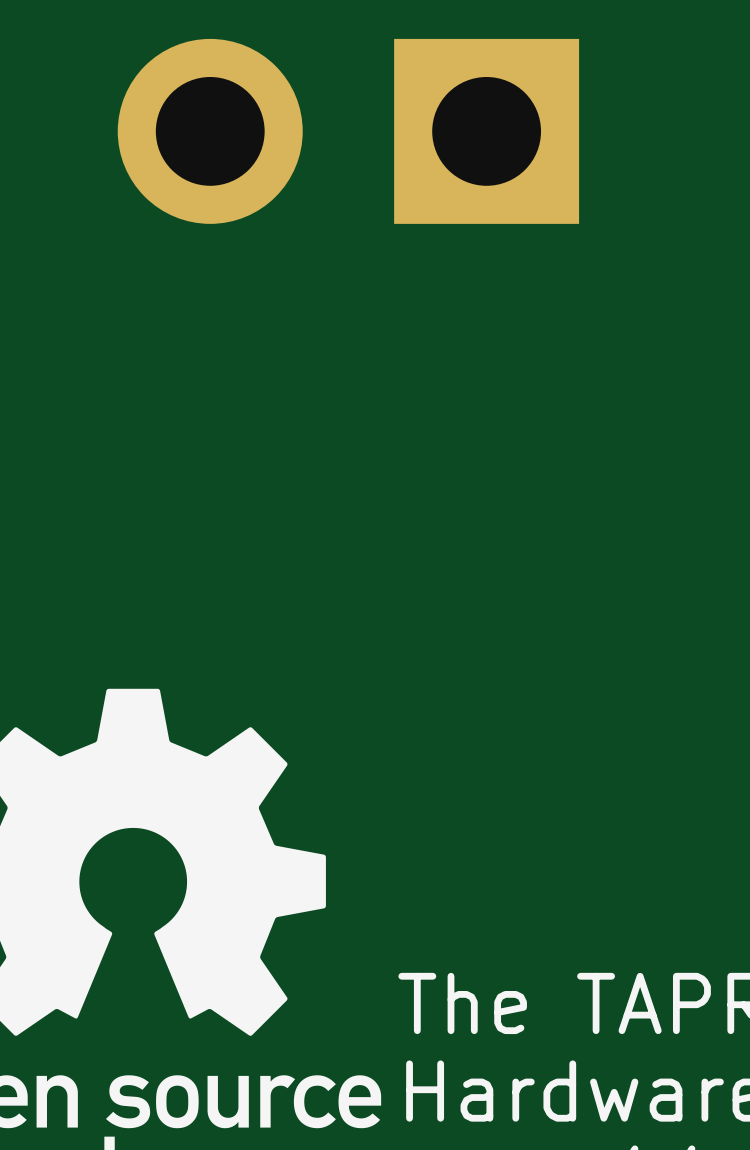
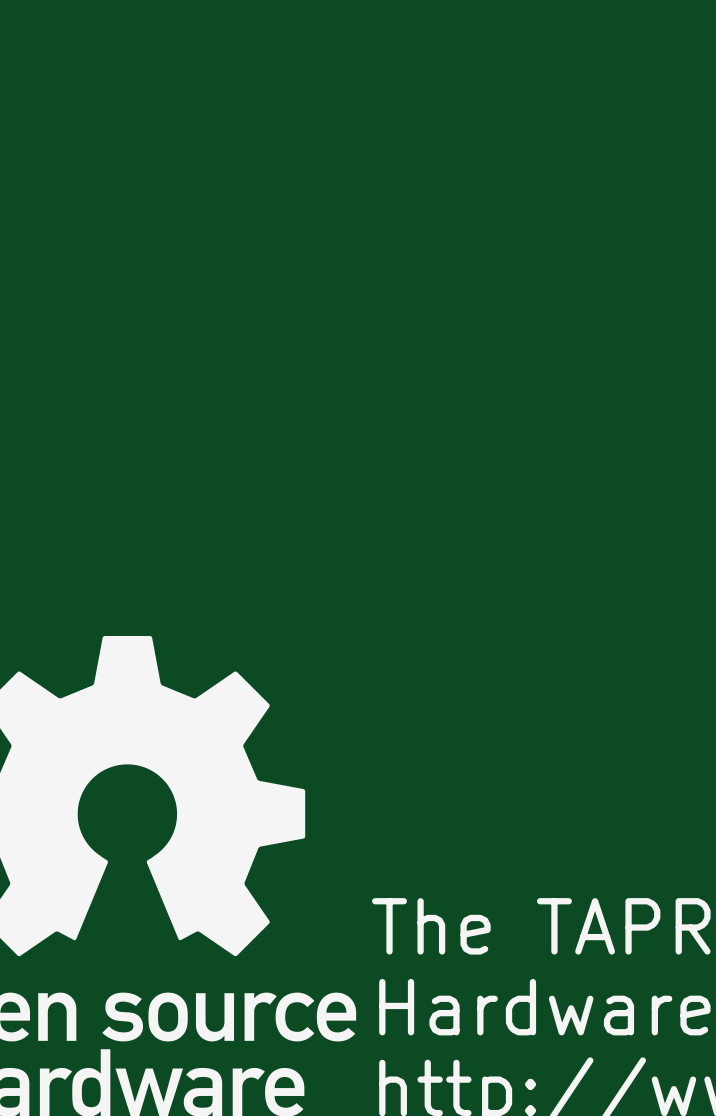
part: (348, 131) -> none

